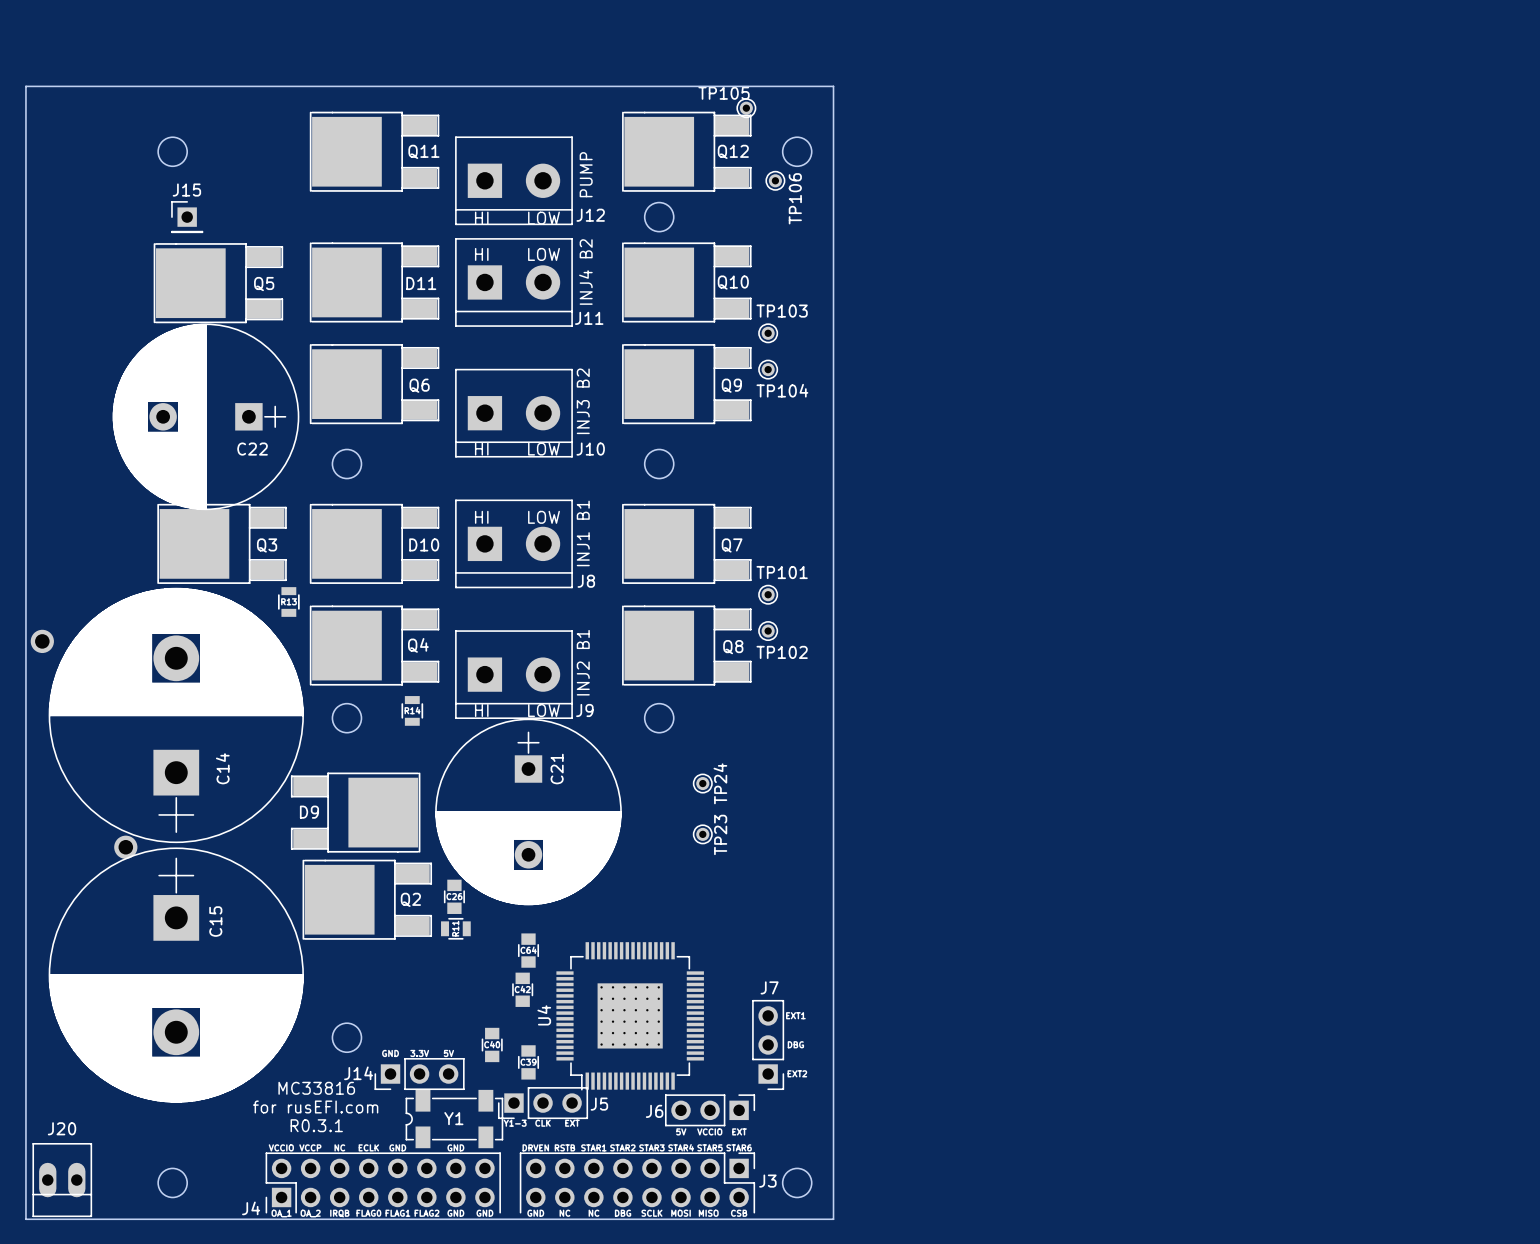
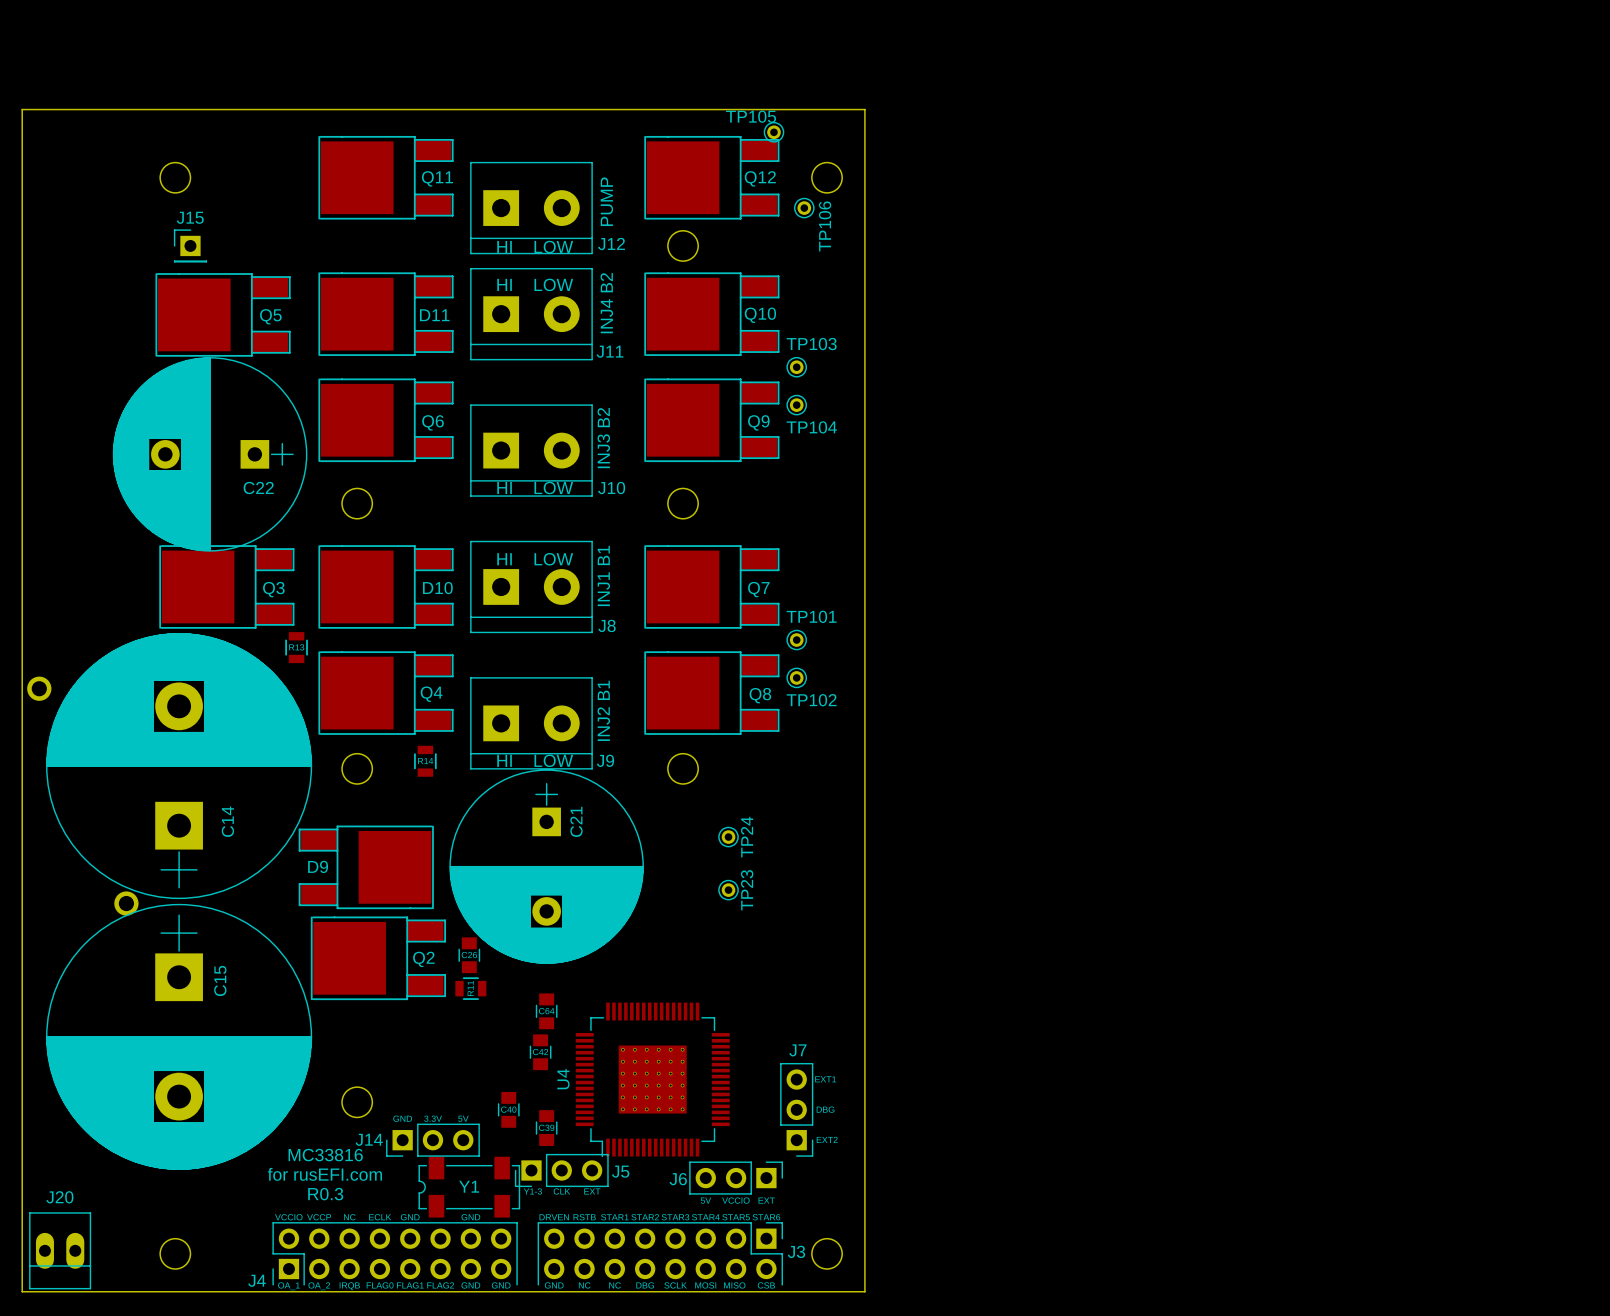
text: R0.3.1 (316, 1125) -> R0.3 (325, 1194)

